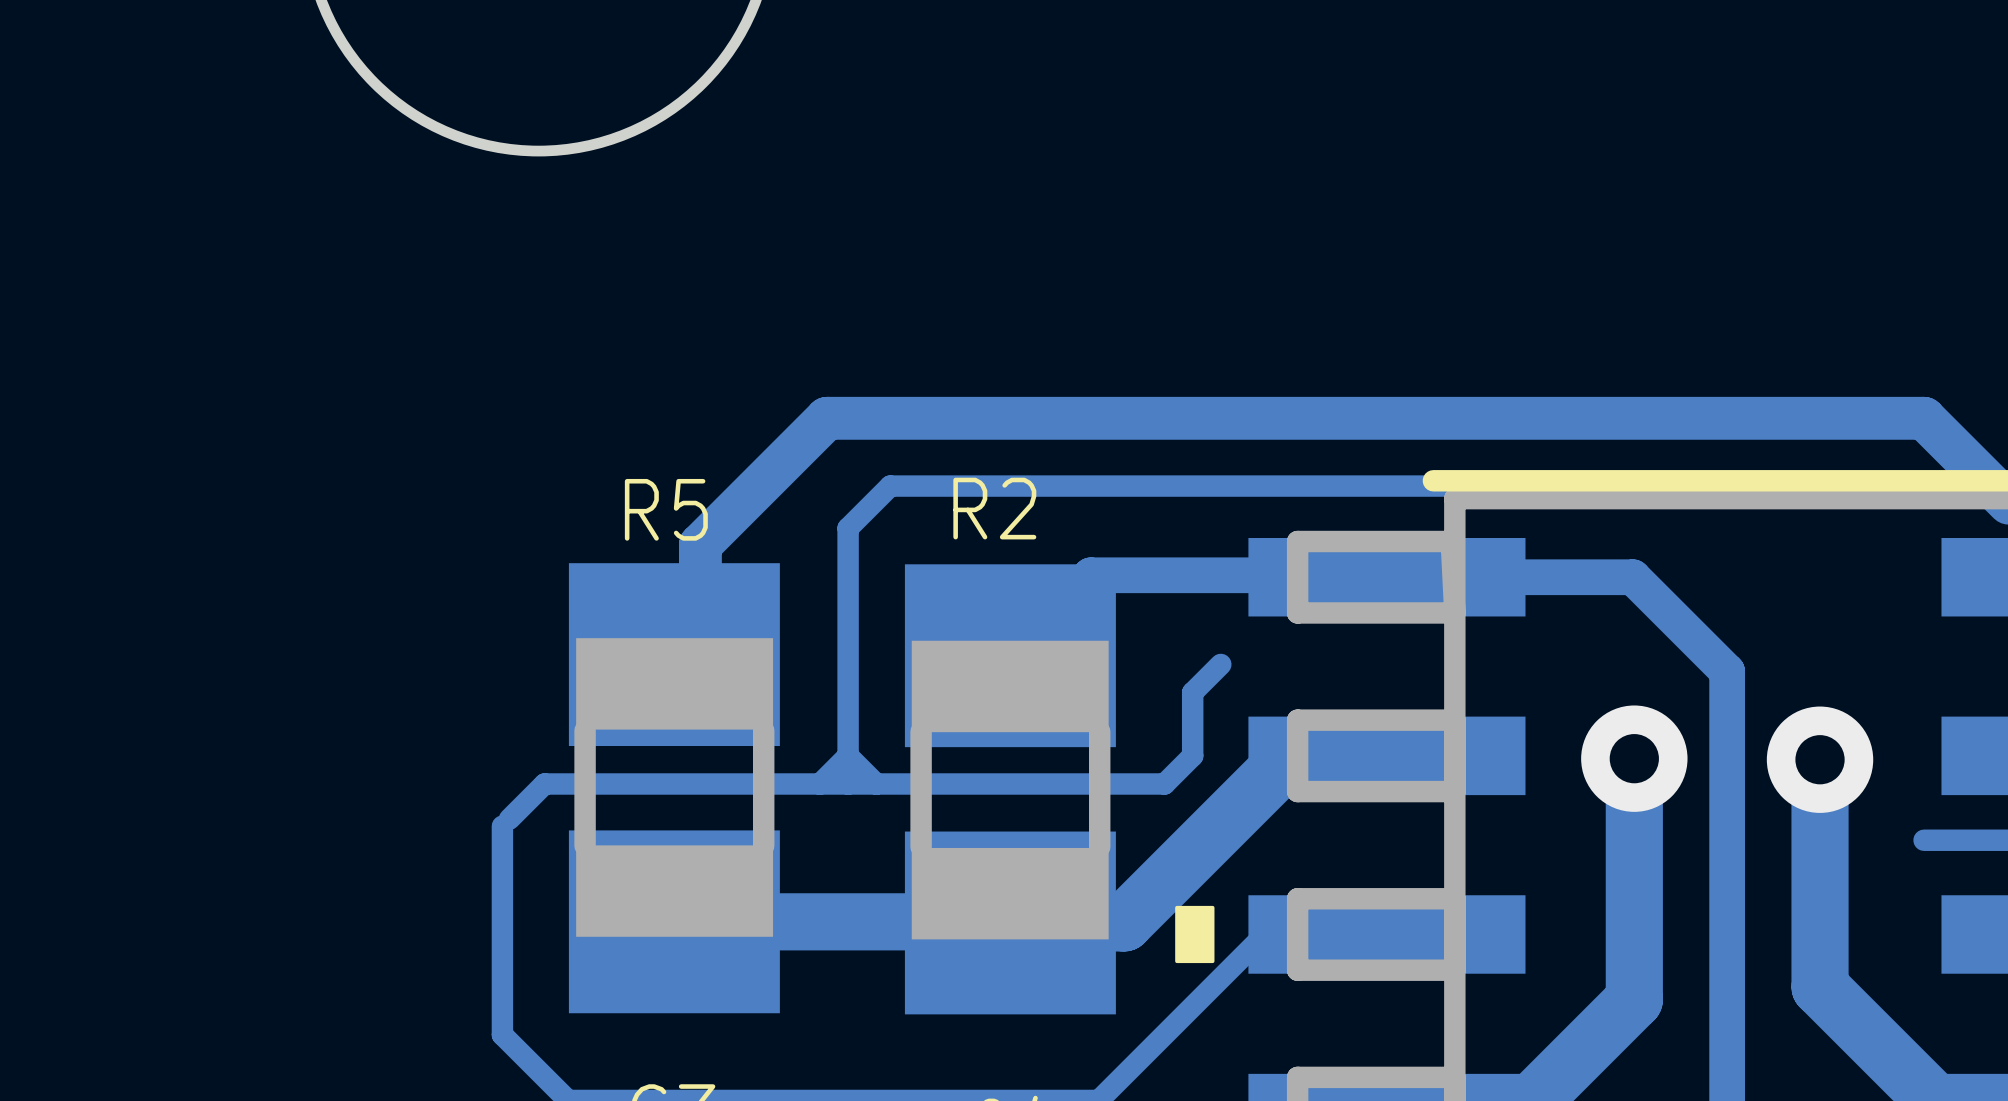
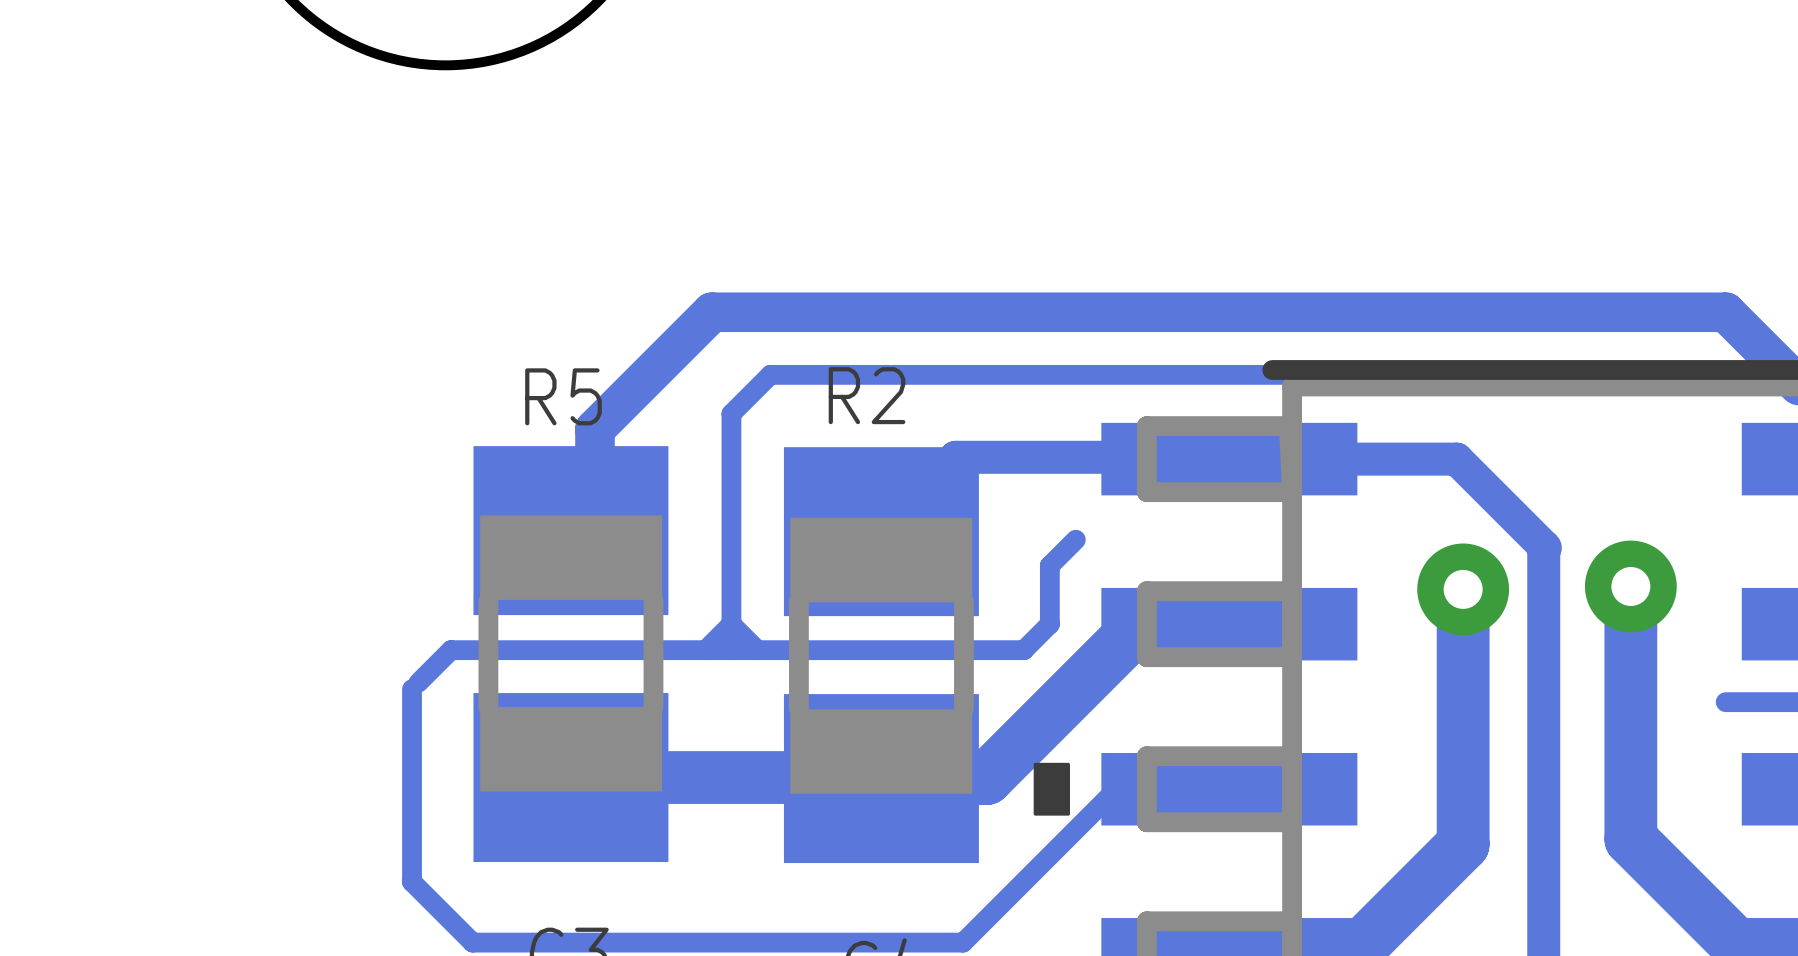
track: (1634, 758) (1634, 999) -> (1463, 589) (1463, 844) (1457, 849)
via position: (1634, 758) -> (1463, 589)
track: (1820, 759) (1820, 987) -> (1630, 586) (1630, 839)
via position: (1820, 759) -> (1630, 586)

